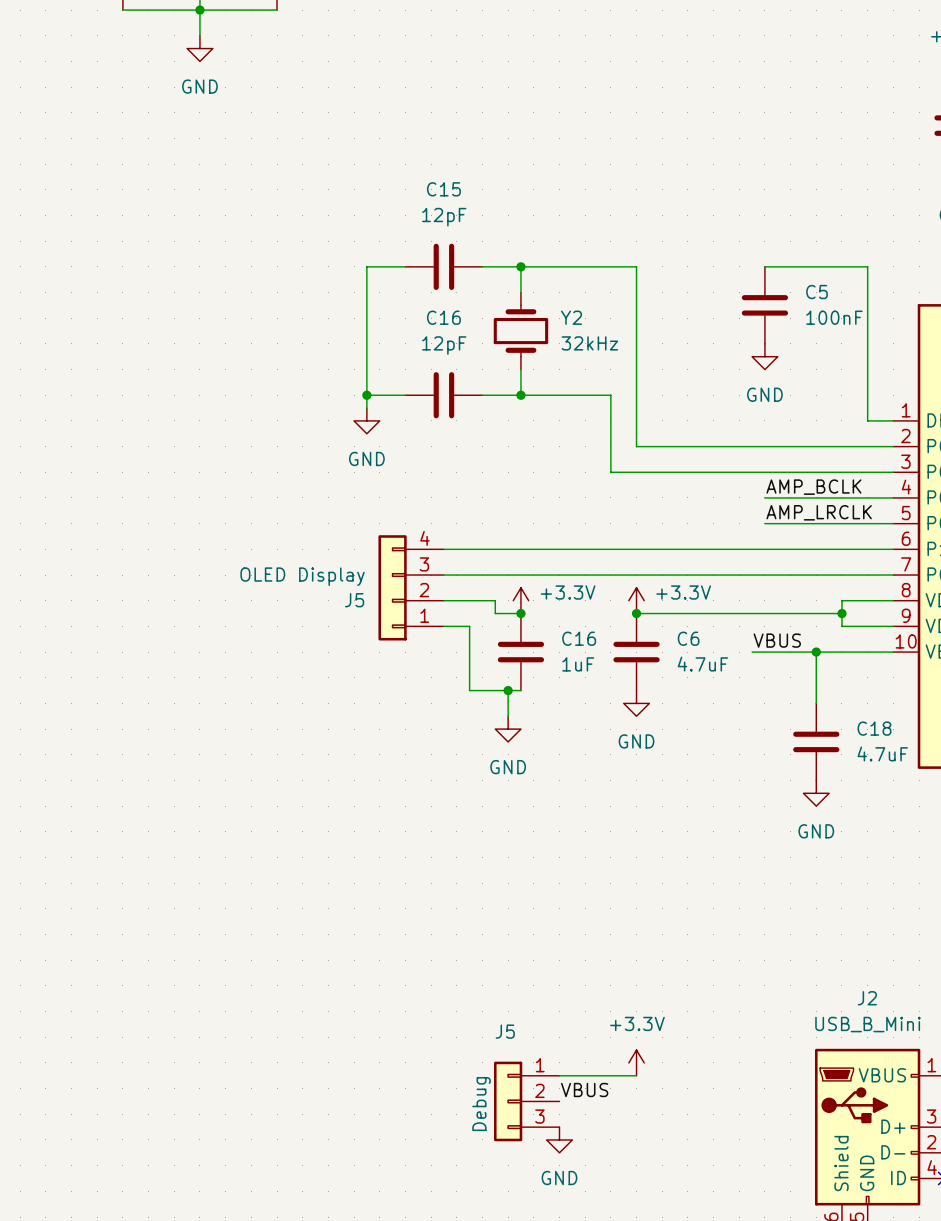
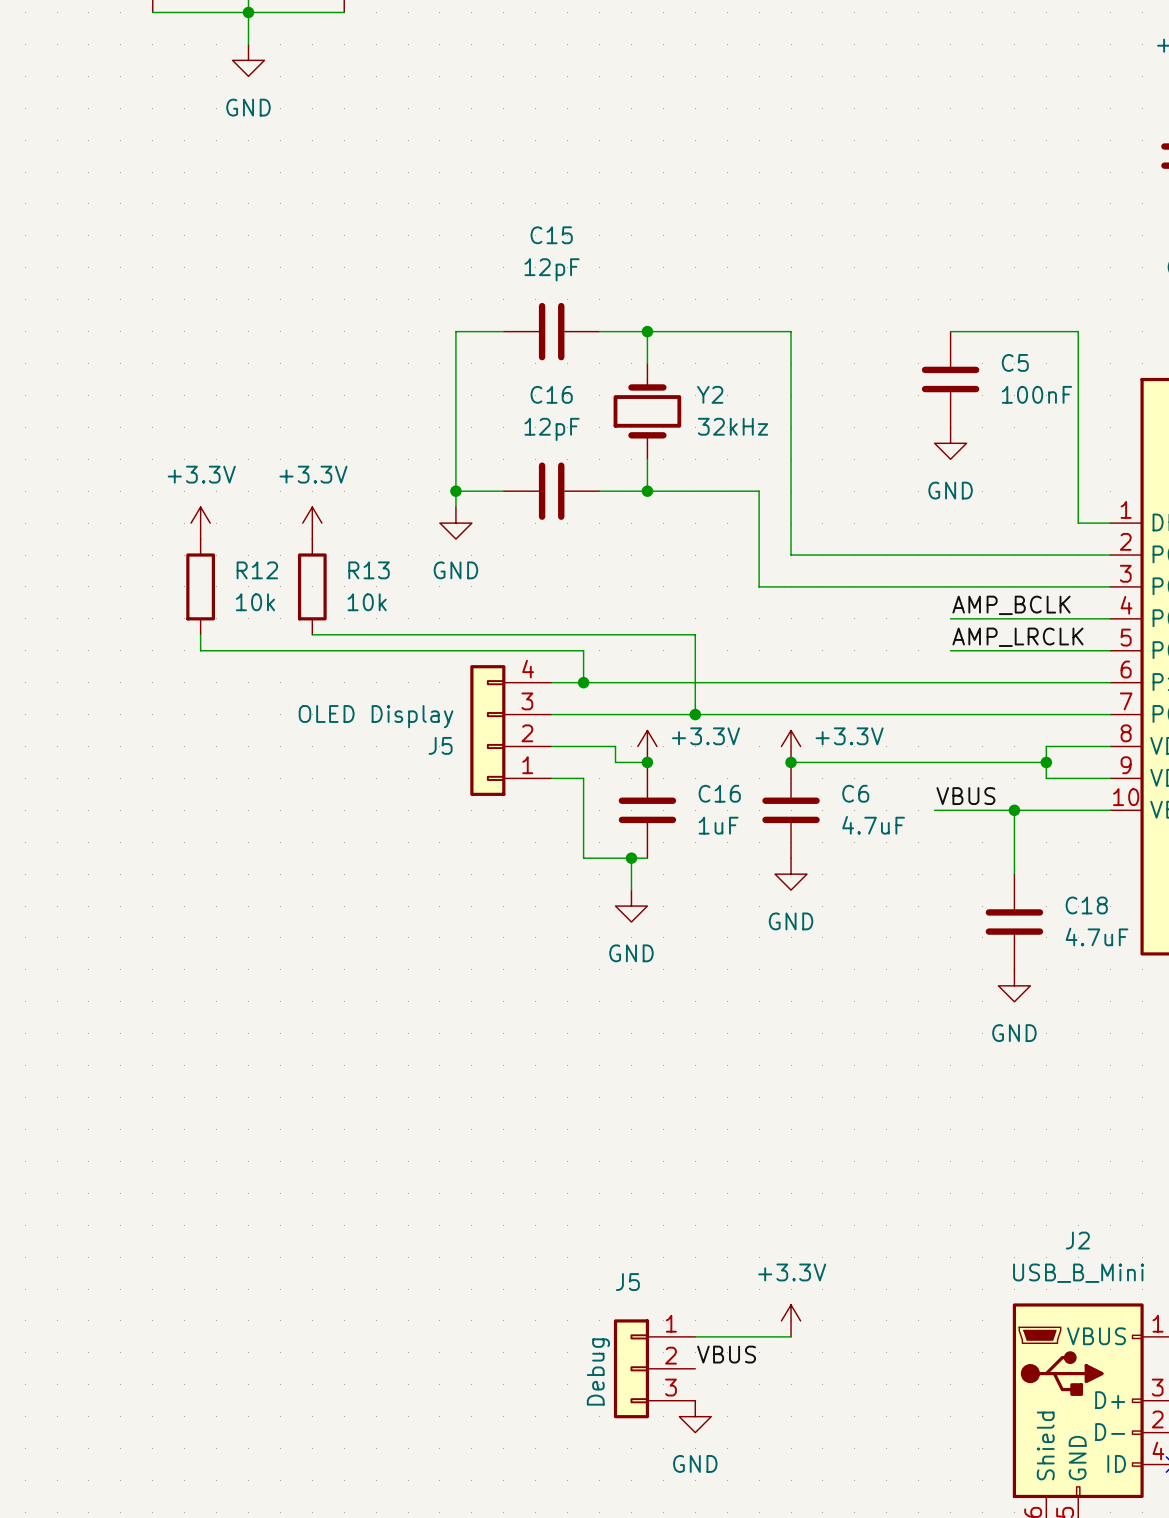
power symbol: none -> +3.3V (200, 523)
power symbol: none -> +3.3V (312, 523)
R12: none -> 10k (200, 586)
R13: none -> 10k (312, 586)
wire: none -> (200, 634) (200, 650) (583, 650) (583, 682)
wire: none -> (312, 634) (695, 634) (695, 714)
junction: none -> (583, 682)
junction: none -> (695, 714)

